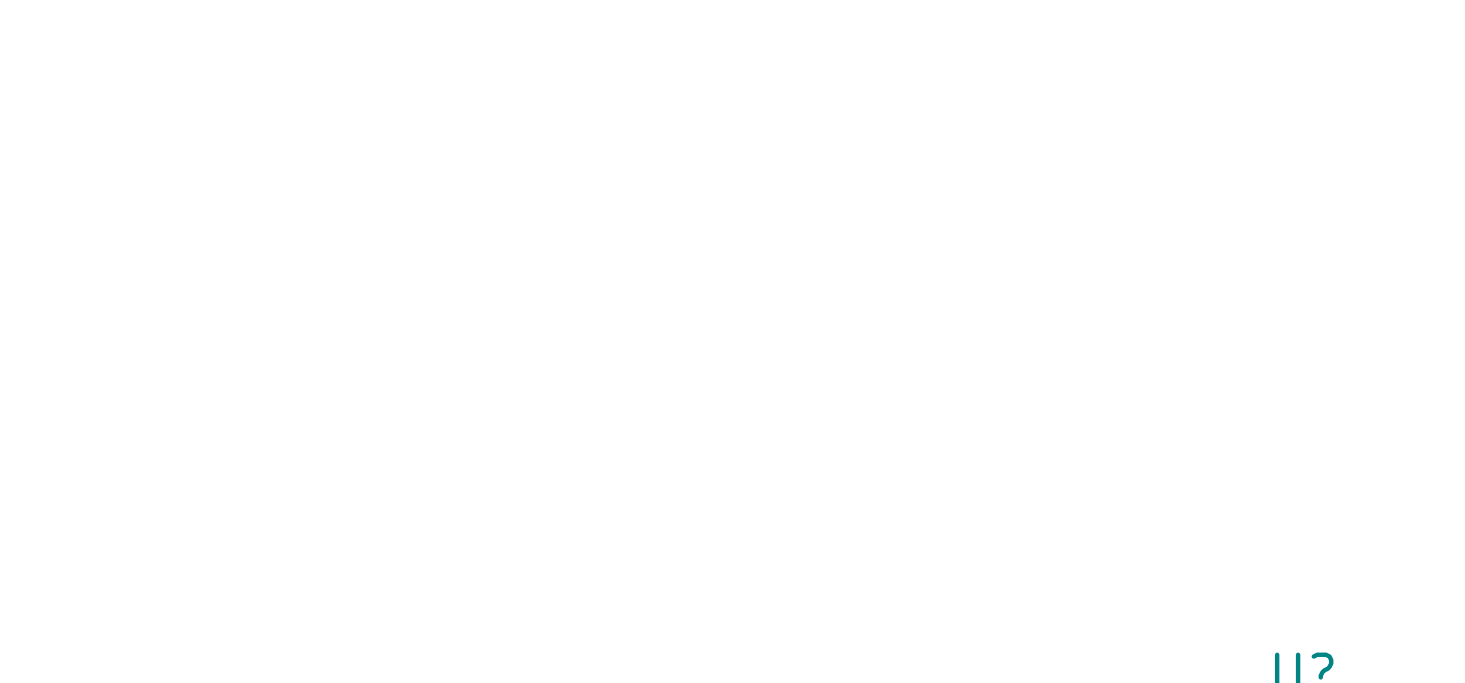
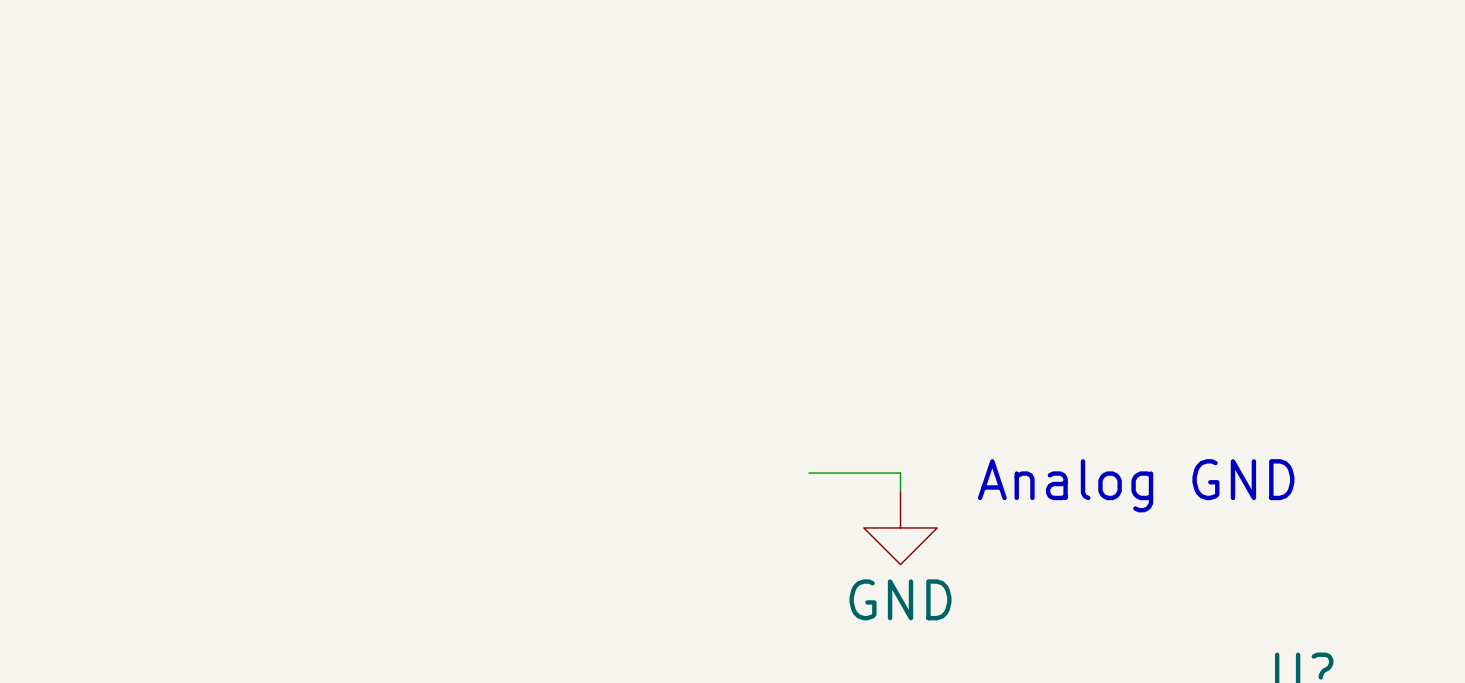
wire: none -> (808, 473) (900, 473) (900, 491)
text: none -> Analog GND (1136, 485)
power symbol: none -> GND (900, 527)

